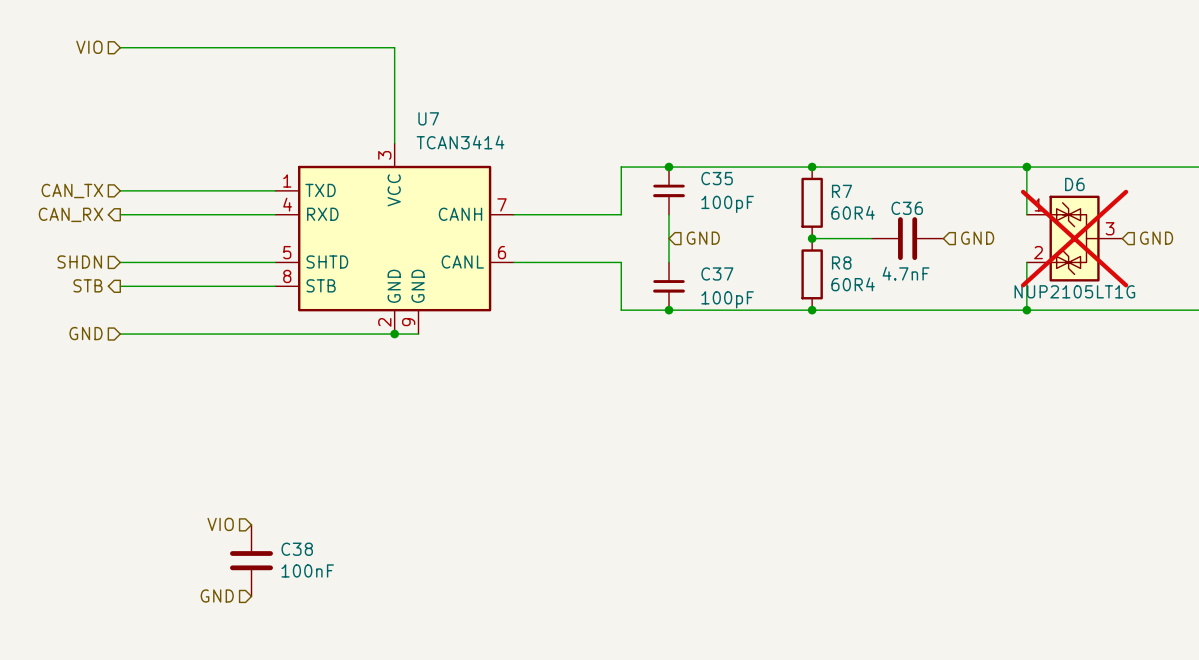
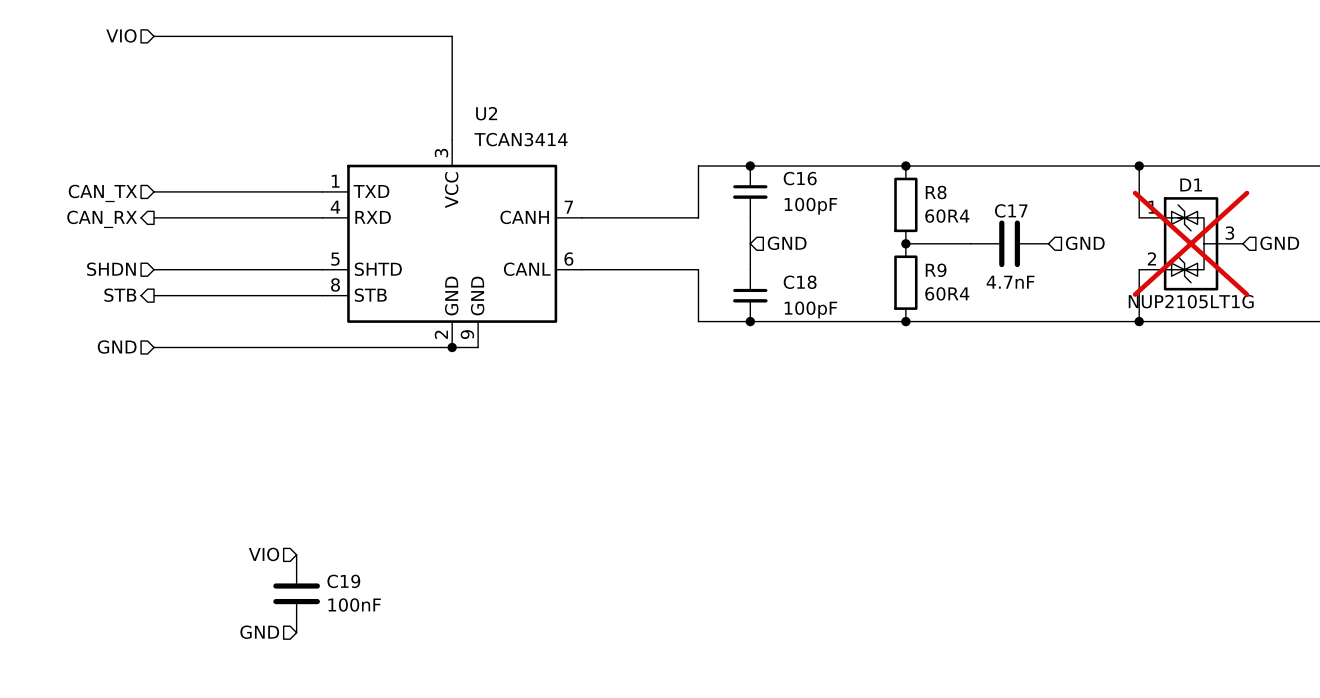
U7 name: U7 (428, 118) -> U2 (486, 113)
C35 name: C35 (717, 178) -> C16 (800, 178)
D6 name: D6 (1074, 184) -> D1 (1191, 184)
R7 name: R7 (842, 191) -> R8 (936, 192)
C36 name: C36 (907, 208) -> C17 (1011, 210)
R8 name: R8 (841, 262) -> R9 (936, 270)
C37 name: C37 (717, 273) -> C18 (800, 282)
C38 name: C38 (297, 549) -> C19 (343, 581)

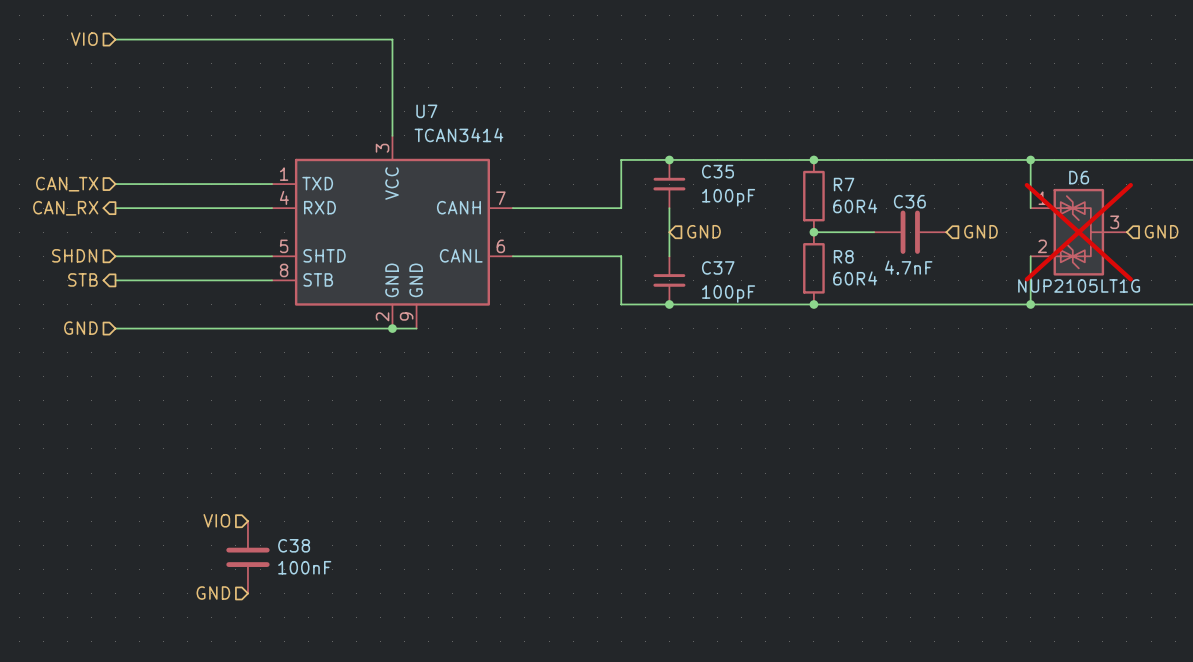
U2 name: U2 (486, 113) -> U7 (426, 111)
C16 name: C16 (800, 178) -> C35 (717, 171)
D1 name: D1 (1191, 184) -> D6 (1079, 177)
R8 name: R8 (936, 192) -> R7 (844, 184)
C17 name: C17 (1011, 210) -> C36 (909, 201)
R9 name: R9 (936, 270) -> R8 (843, 256)
C18 name: C18 (800, 282) -> C37 (718, 267)
C19 name: C19 (343, 581) -> C38 (294, 545)

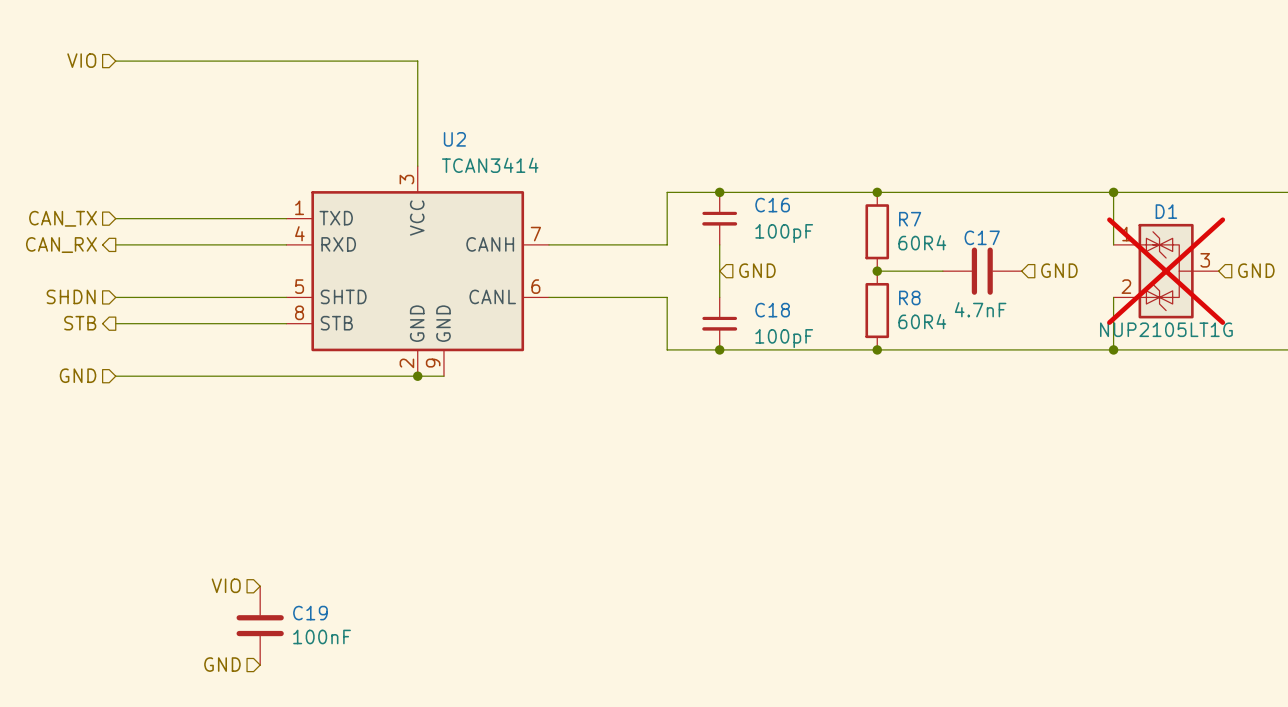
U7 name: U7 (426, 111) -> U2 (454, 139)
C35 name: C35 (717, 171) -> C16 (772, 205)
D6 name: D6 (1079, 177) -> D1 (1166, 211)
C36 name: C36 (909, 201) -> C17 (982, 237)
C37 name: C37 (718, 267) -> C18 (772, 310)
C38 name: C38 (294, 545) -> C19 (310, 613)

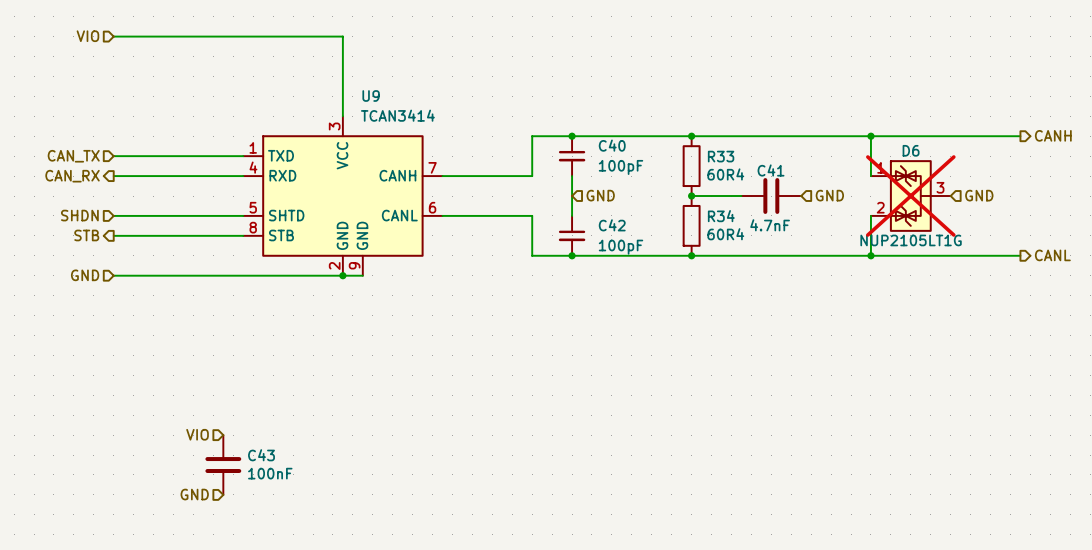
U2 name: U2 (454, 139) -> U9 (371, 95)
C16 name: C16 (772, 205) -> C40 (612, 145)
D1 name: D1 (1166, 211) -> D6 (911, 150)
R7 name: R7 (910, 219) -> R33 (721, 156)
C17 name: C17 (982, 237) -> C41 (771, 170)
R8 name: R8 (909, 297) -> R34 (721, 216)
C18 name: C18 (772, 310) -> C42 (612, 225)
C19 name: C19 (310, 613) -> C43 (261, 455)

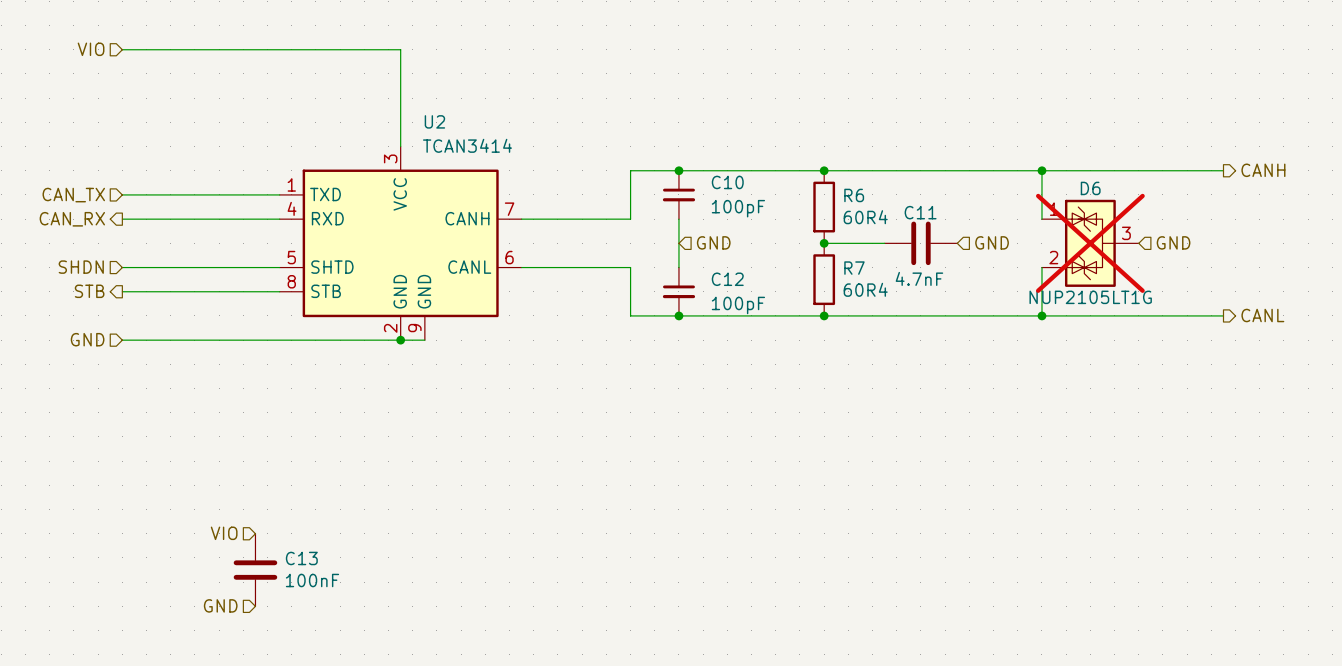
U9 name: U9 (371, 95) -> U2 (434, 121)
C40 name: C40 (612, 145) -> C10 (727, 182)
R33 name: R33 (721, 156) -> R6 (854, 195)
C41 name: C41 (771, 170) -> C11 (920, 212)
R34 name: R34 (721, 216) -> R7 (854, 268)
C42 name: C42 (612, 225) -> C12 (727, 279)
C43 name: C43 (261, 455) -> C13 (301, 558)

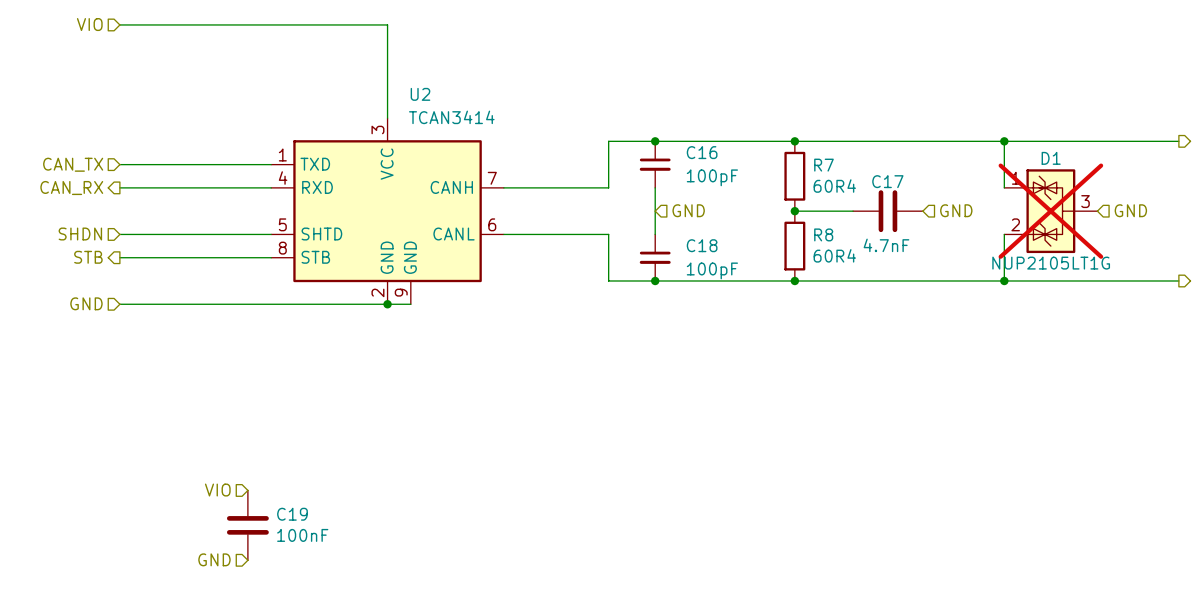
C10 name: C10 (727, 182) -> C16 (702, 152)
D6 name: D6 (1090, 188) -> D1 (1051, 158)
R6 name: R6 (854, 195) -> R7 (823, 165)
C11 name: C11 (920, 212) -> C17 (887, 181)
R7 name: R7 (854, 268) -> R8 (823, 234)
C12 name: C12 (727, 279) -> C18 (702, 245)
C13 name: C13 (301, 558) -> C19 (292, 514)

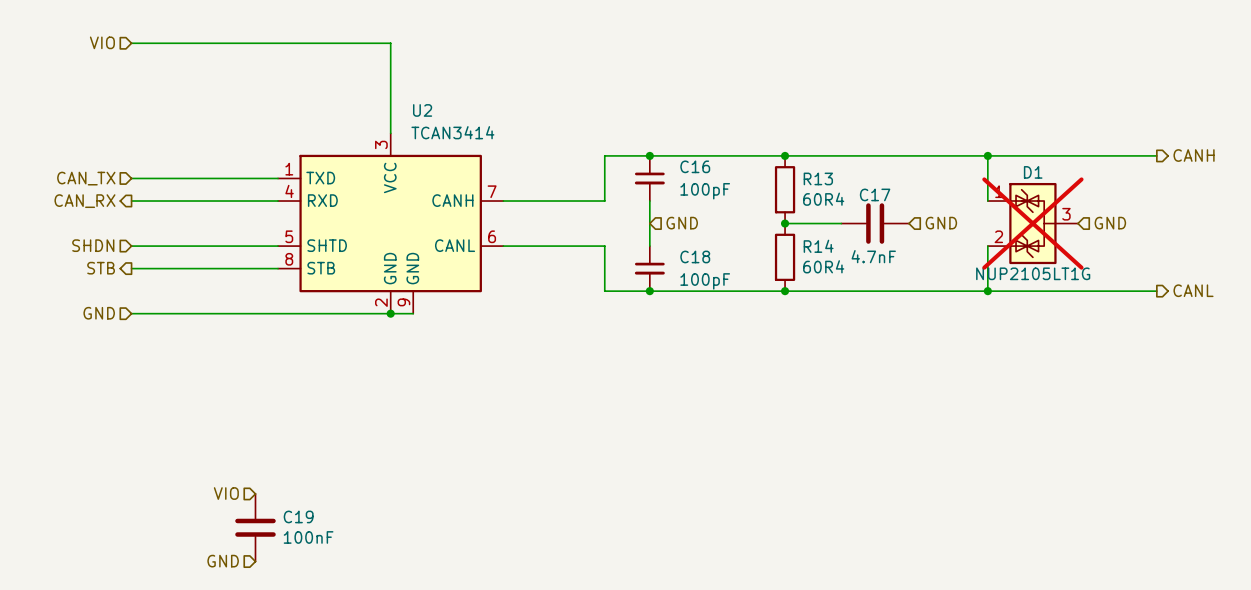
R7 name: R7 (823, 165) -> R13 (818, 178)
R8 name: R8 (823, 234) -> R14 (818, 246)

